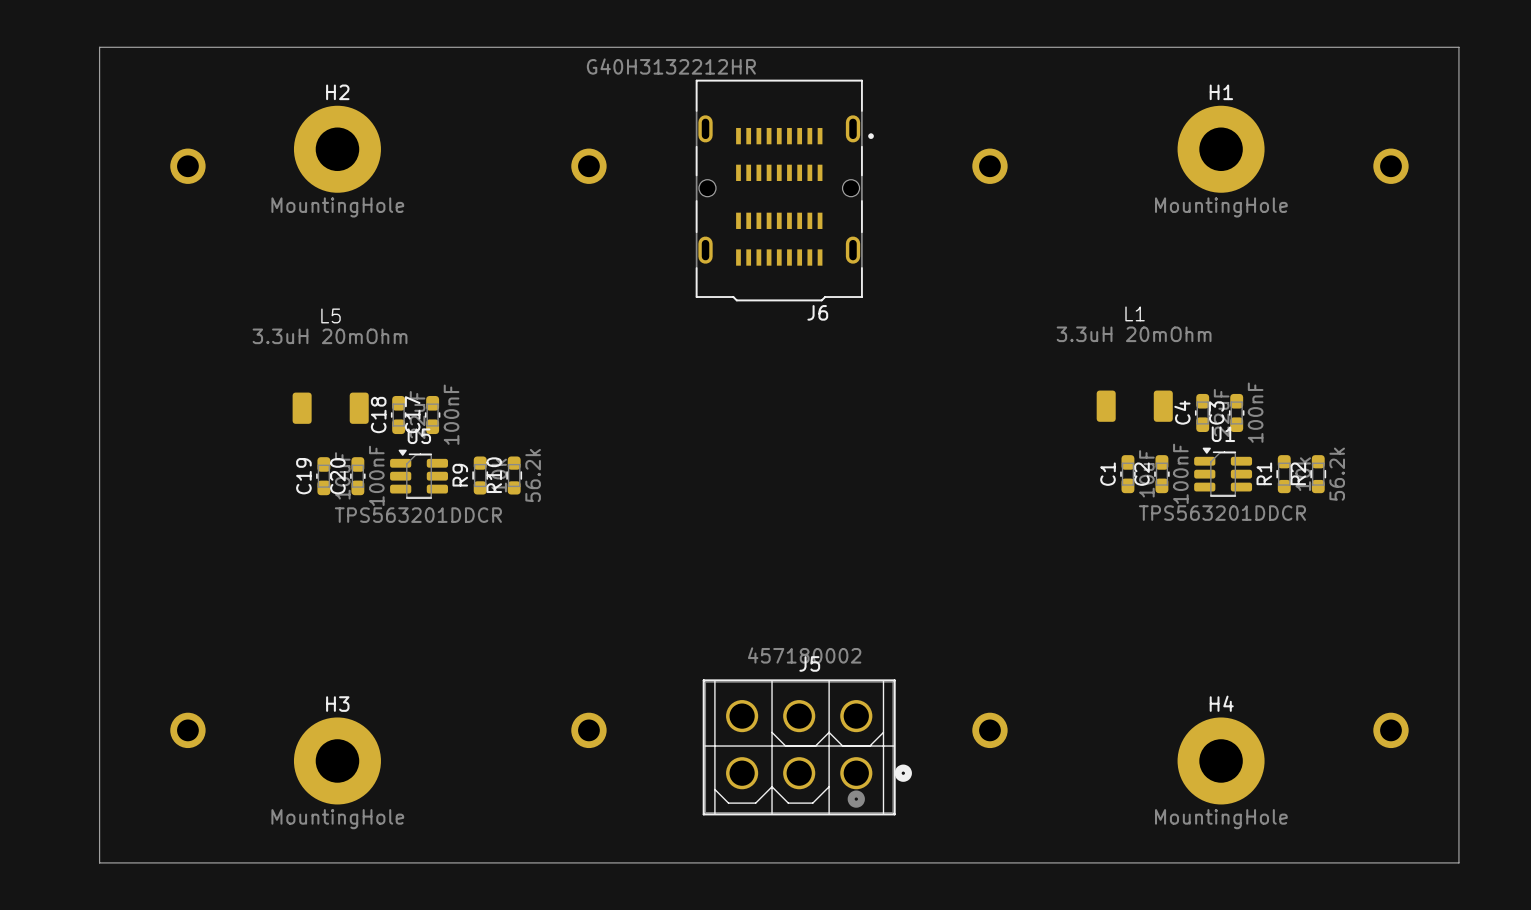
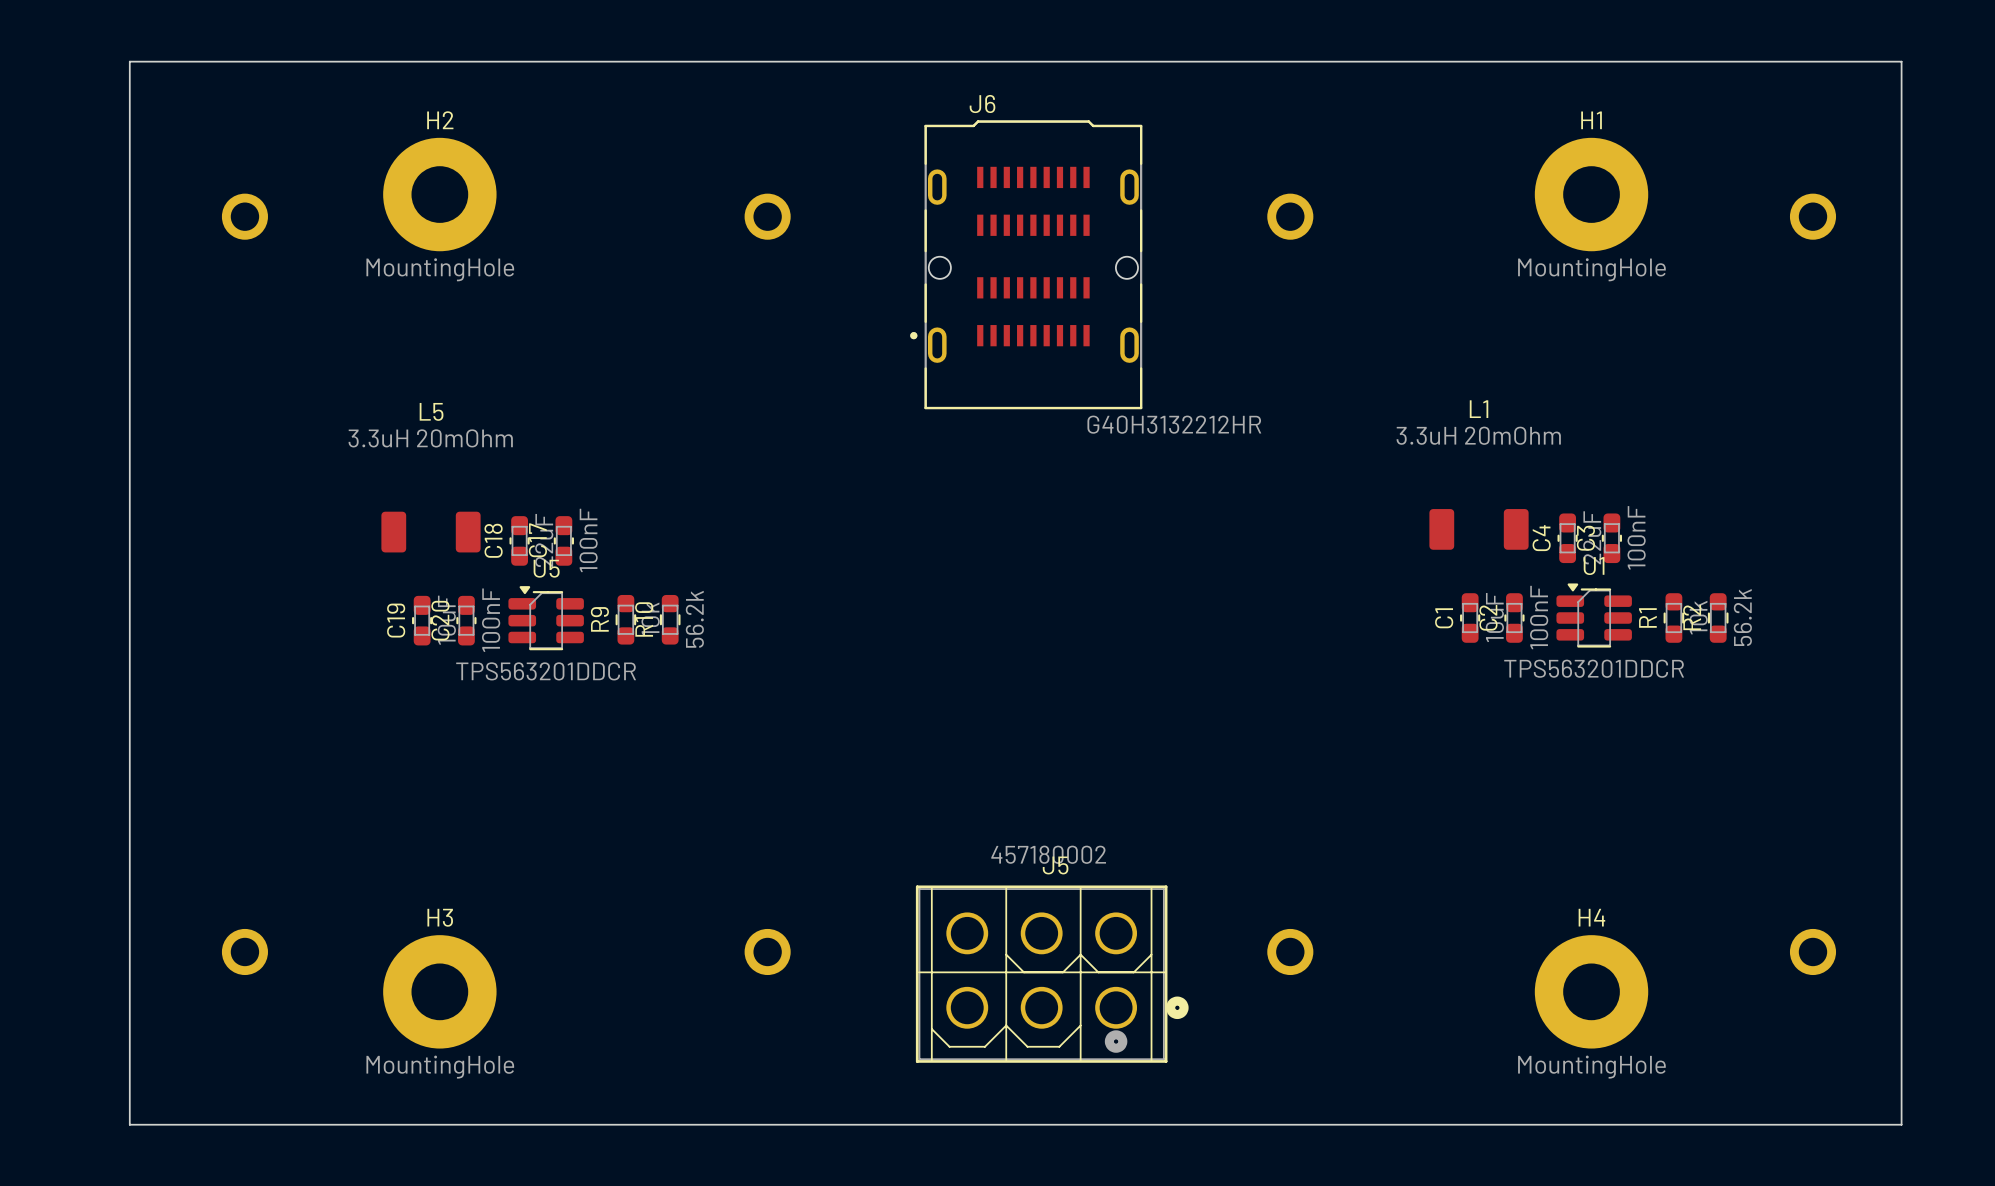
J6 rotation: 0° (784, 190) -> 180° (1026, 264)

